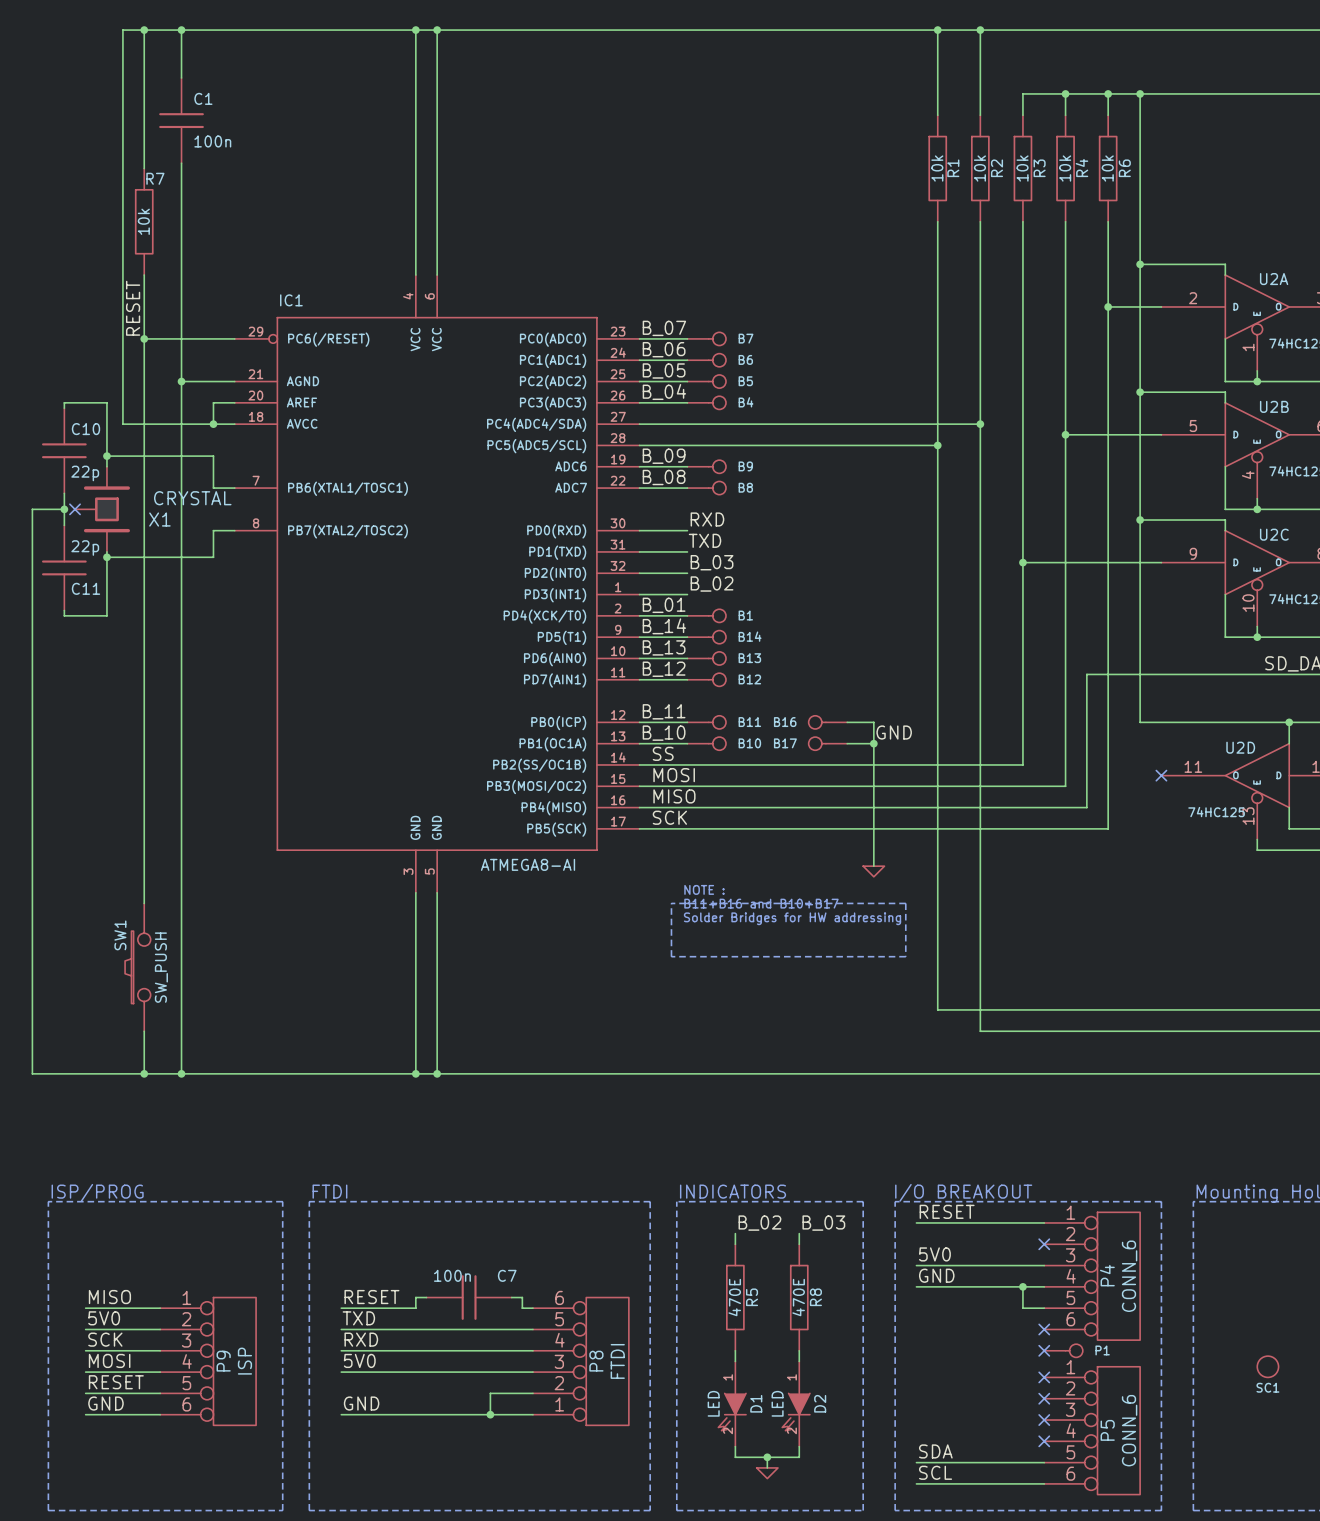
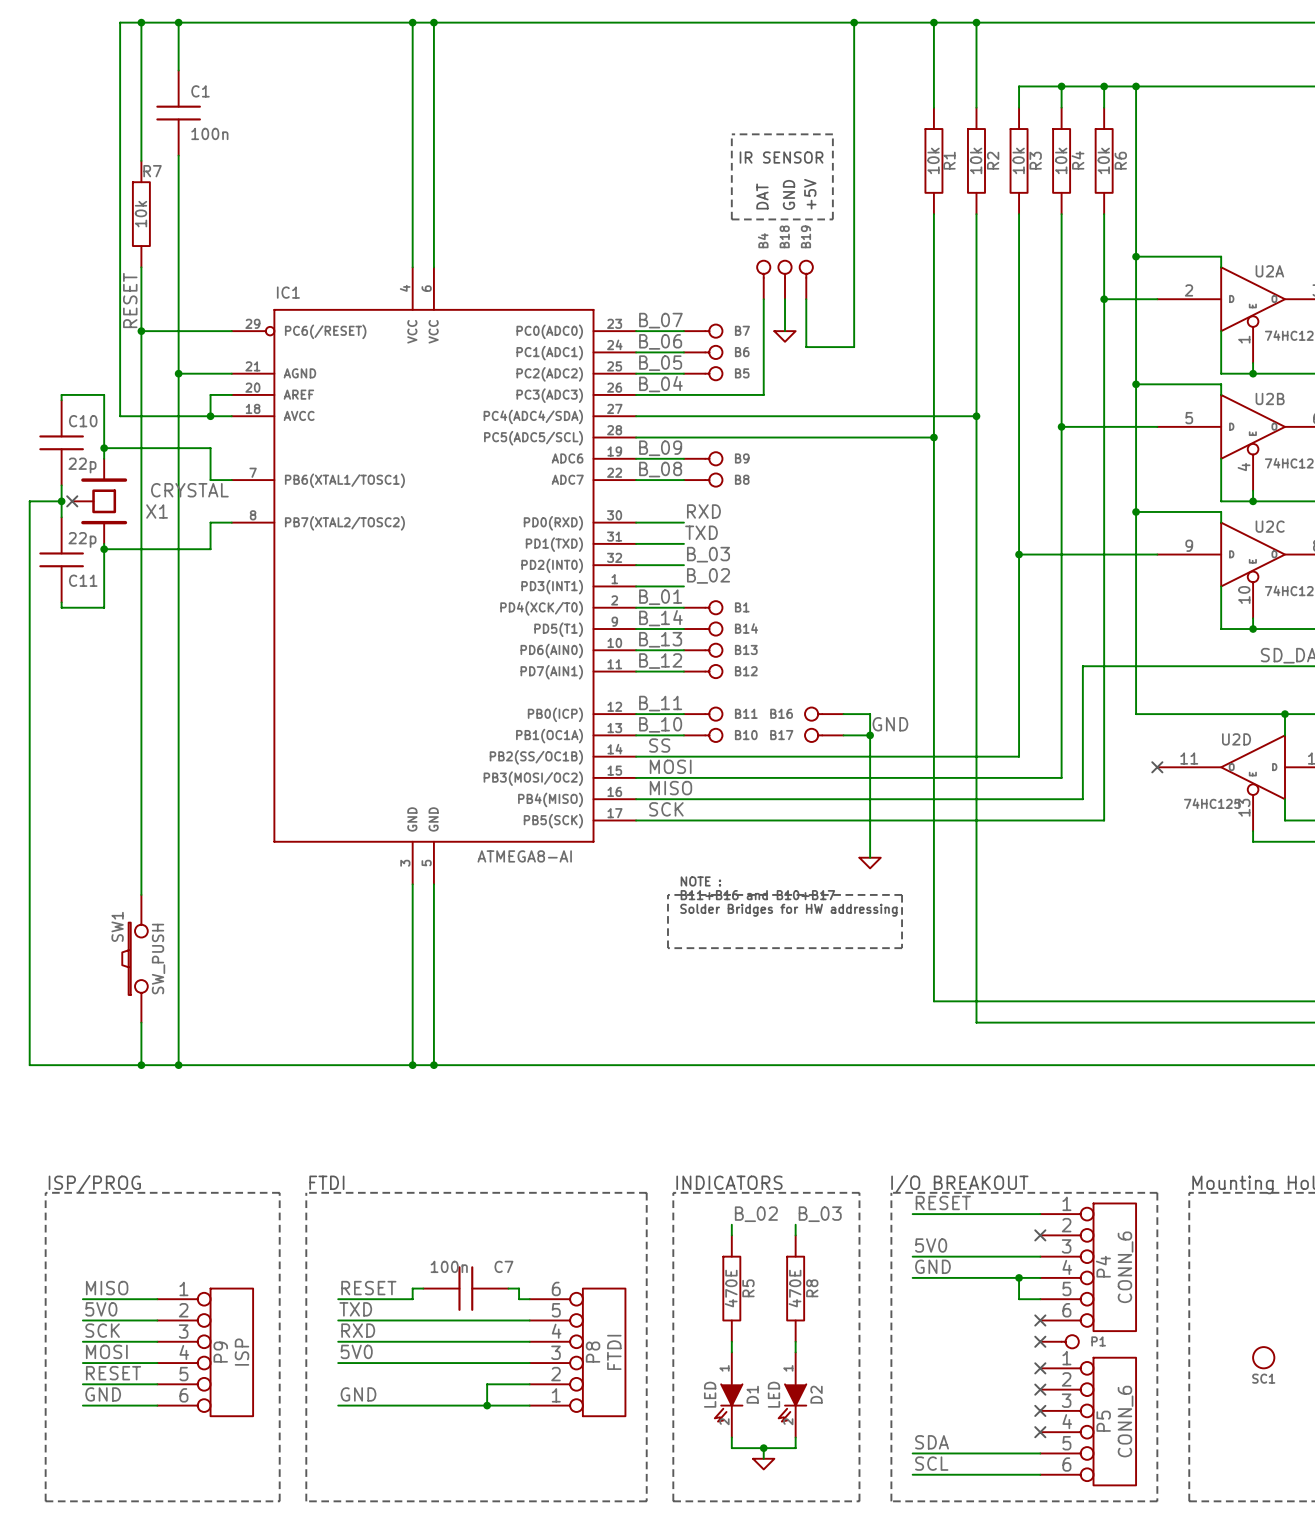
wire: none -> (854, 22) (854, 347) (806, 347) (806, 299)
junction: none -> (854, 22)
line: none -> (731, 134) (731, 219) (832, 219) (832, 134) (731, 134)
text: none -> IR SENSOR (781, 157)
text: none -> +5V (810, 194)
text: none -> GND (789, 194)
text: none -> DAT (762, 196)
B18: none -> (785, 279)
B19: none -> (806, 279)
wire: none -> (763, 299) (763, 394) (683, 394)
wire: none -> (785, 299) (785, 331)
power symbol: none -> (785, 336)
B4 position: (706, 402) -> (763, 279)
B4 rotation: 0° (717, 402) -> 90° counterclockwise (763, 269)

